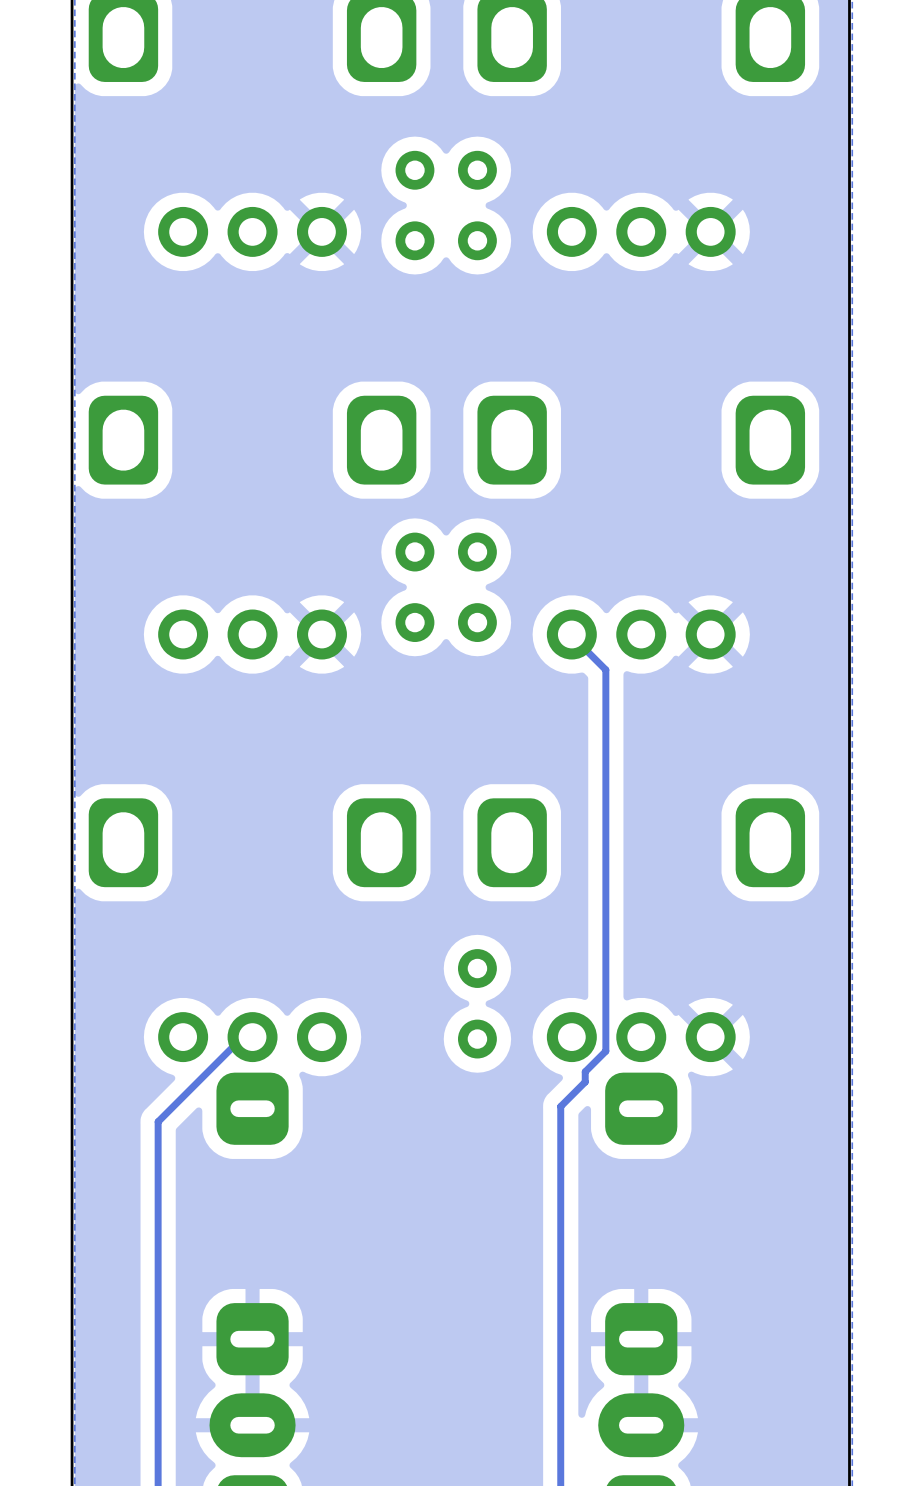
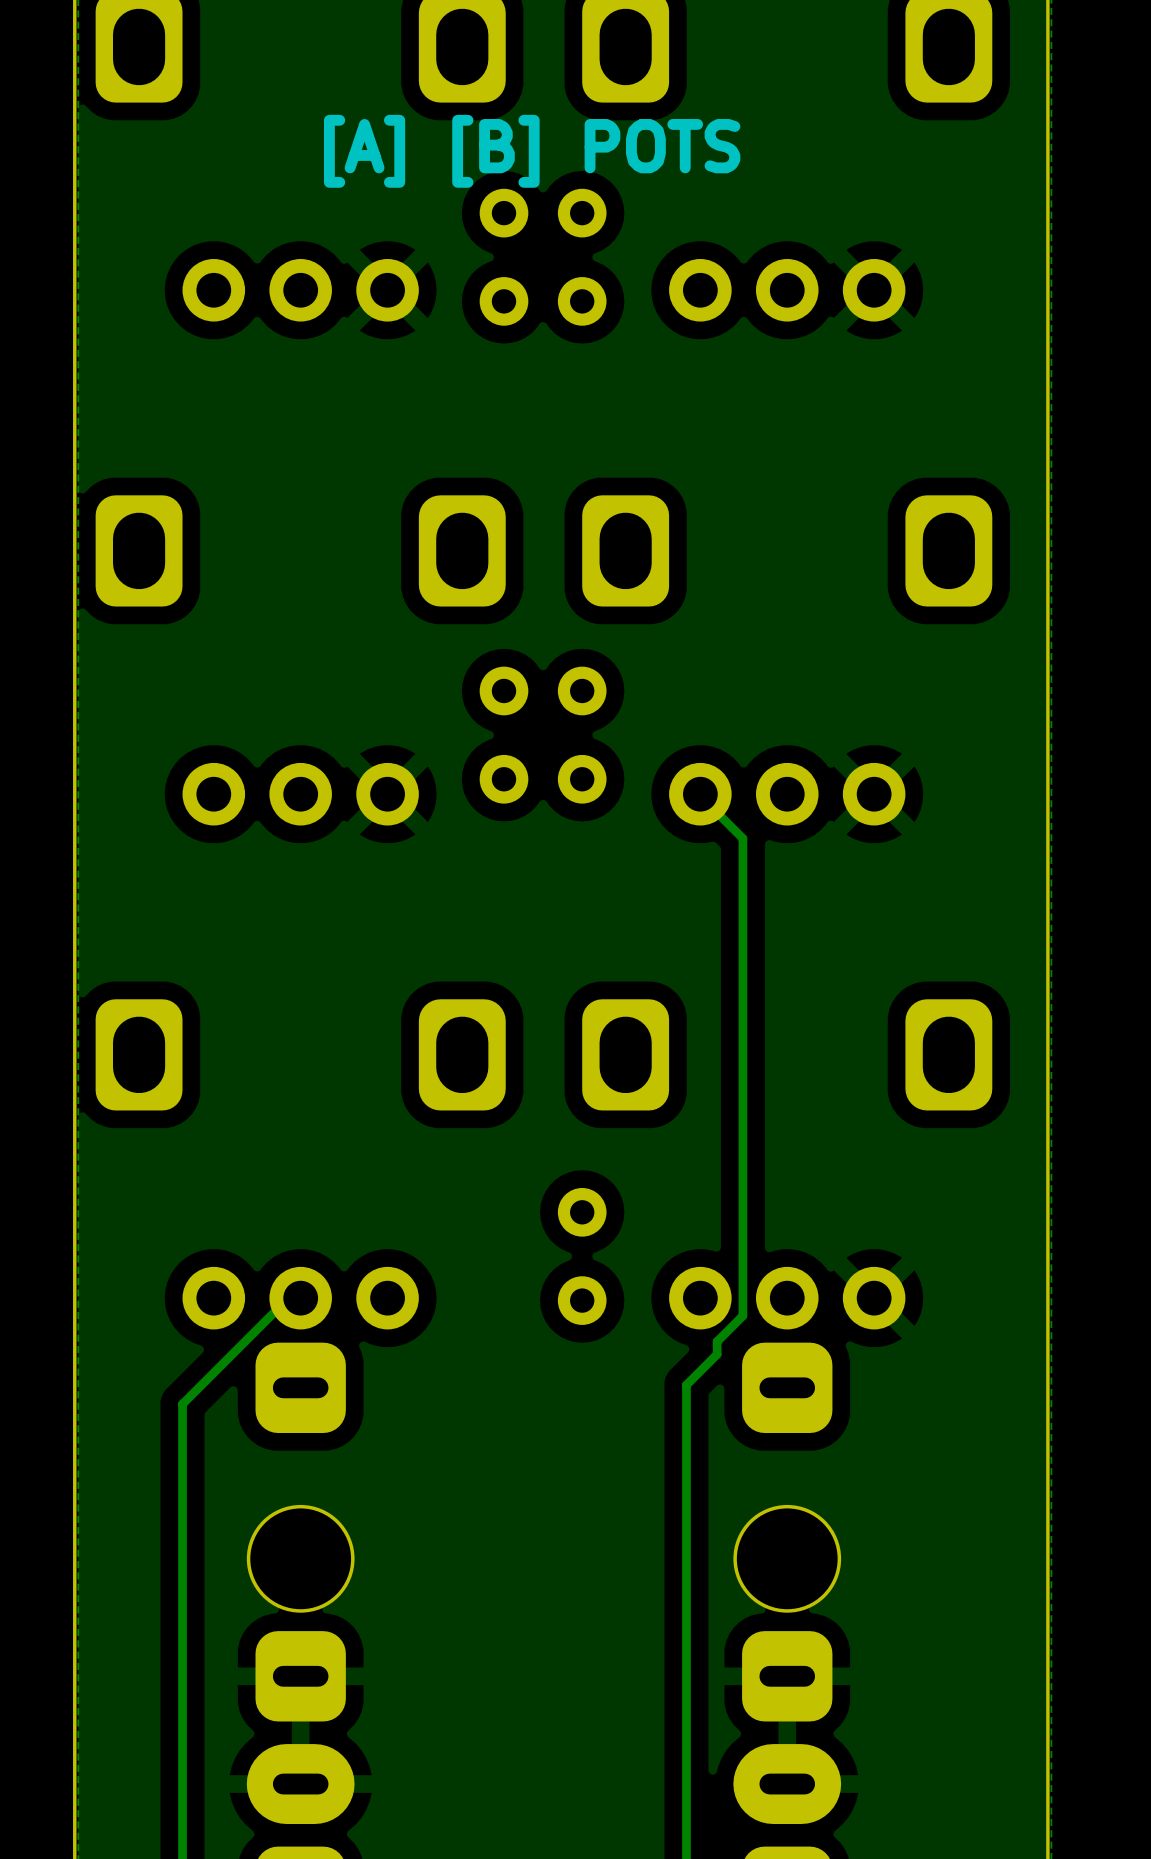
text: none -> [A] [B] POTS (532, 151)
round board edge: none -> [246, 1504, 355, 1613]
round board edge: none -> [733, 1504, 842, 1613]

